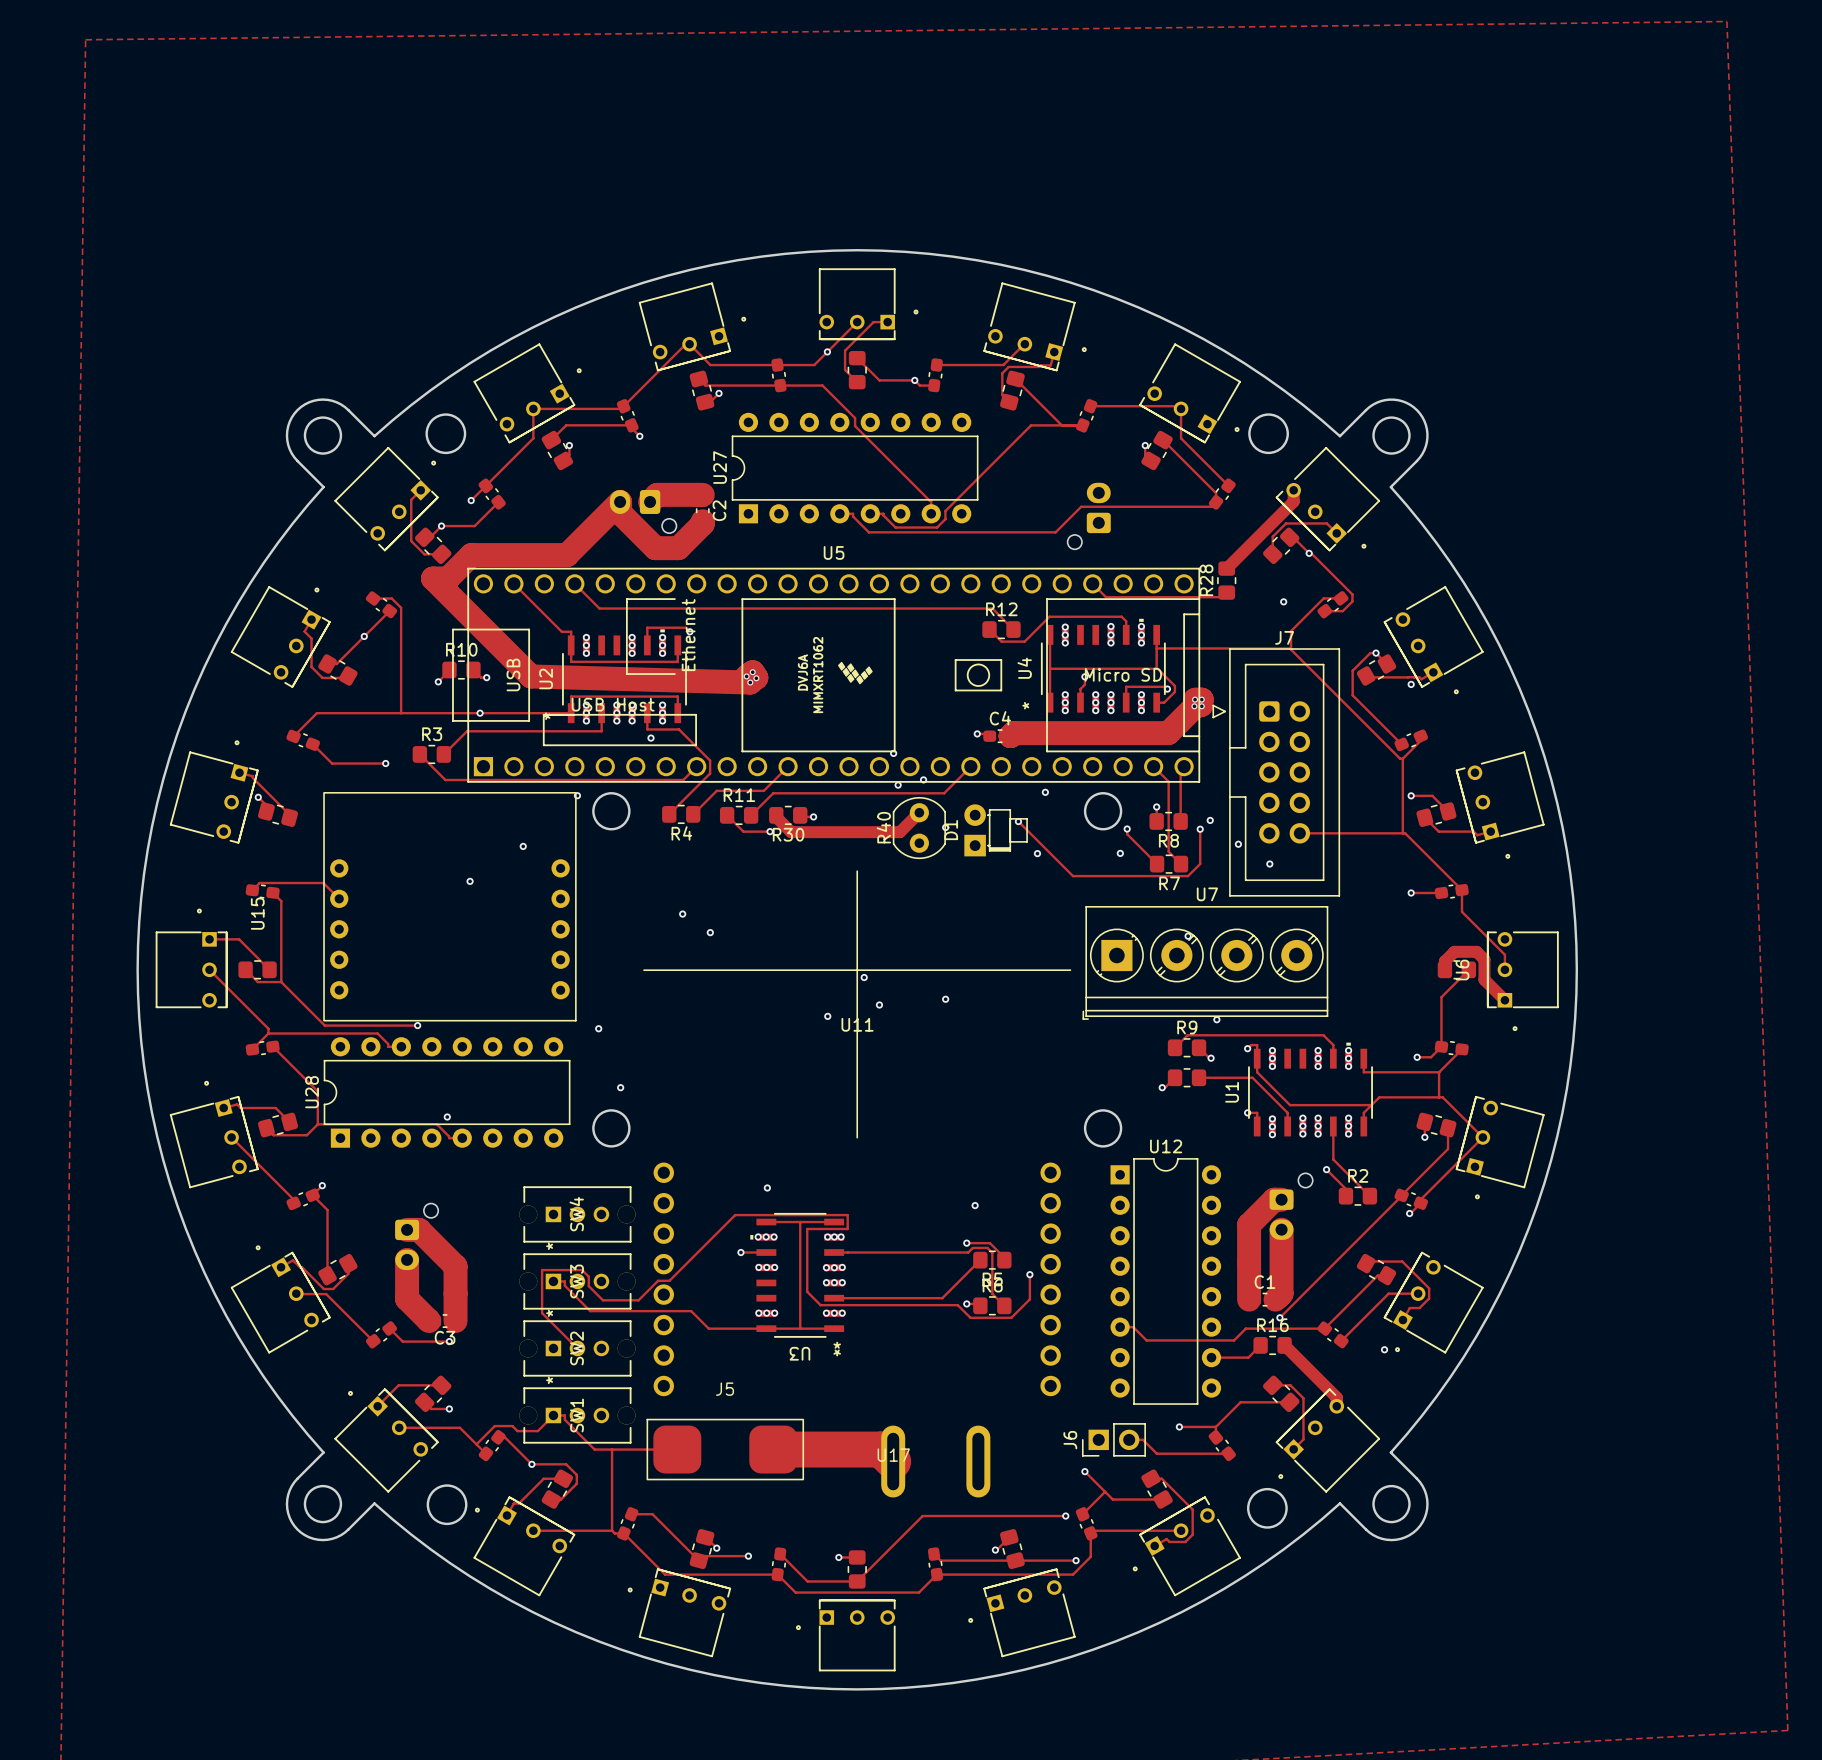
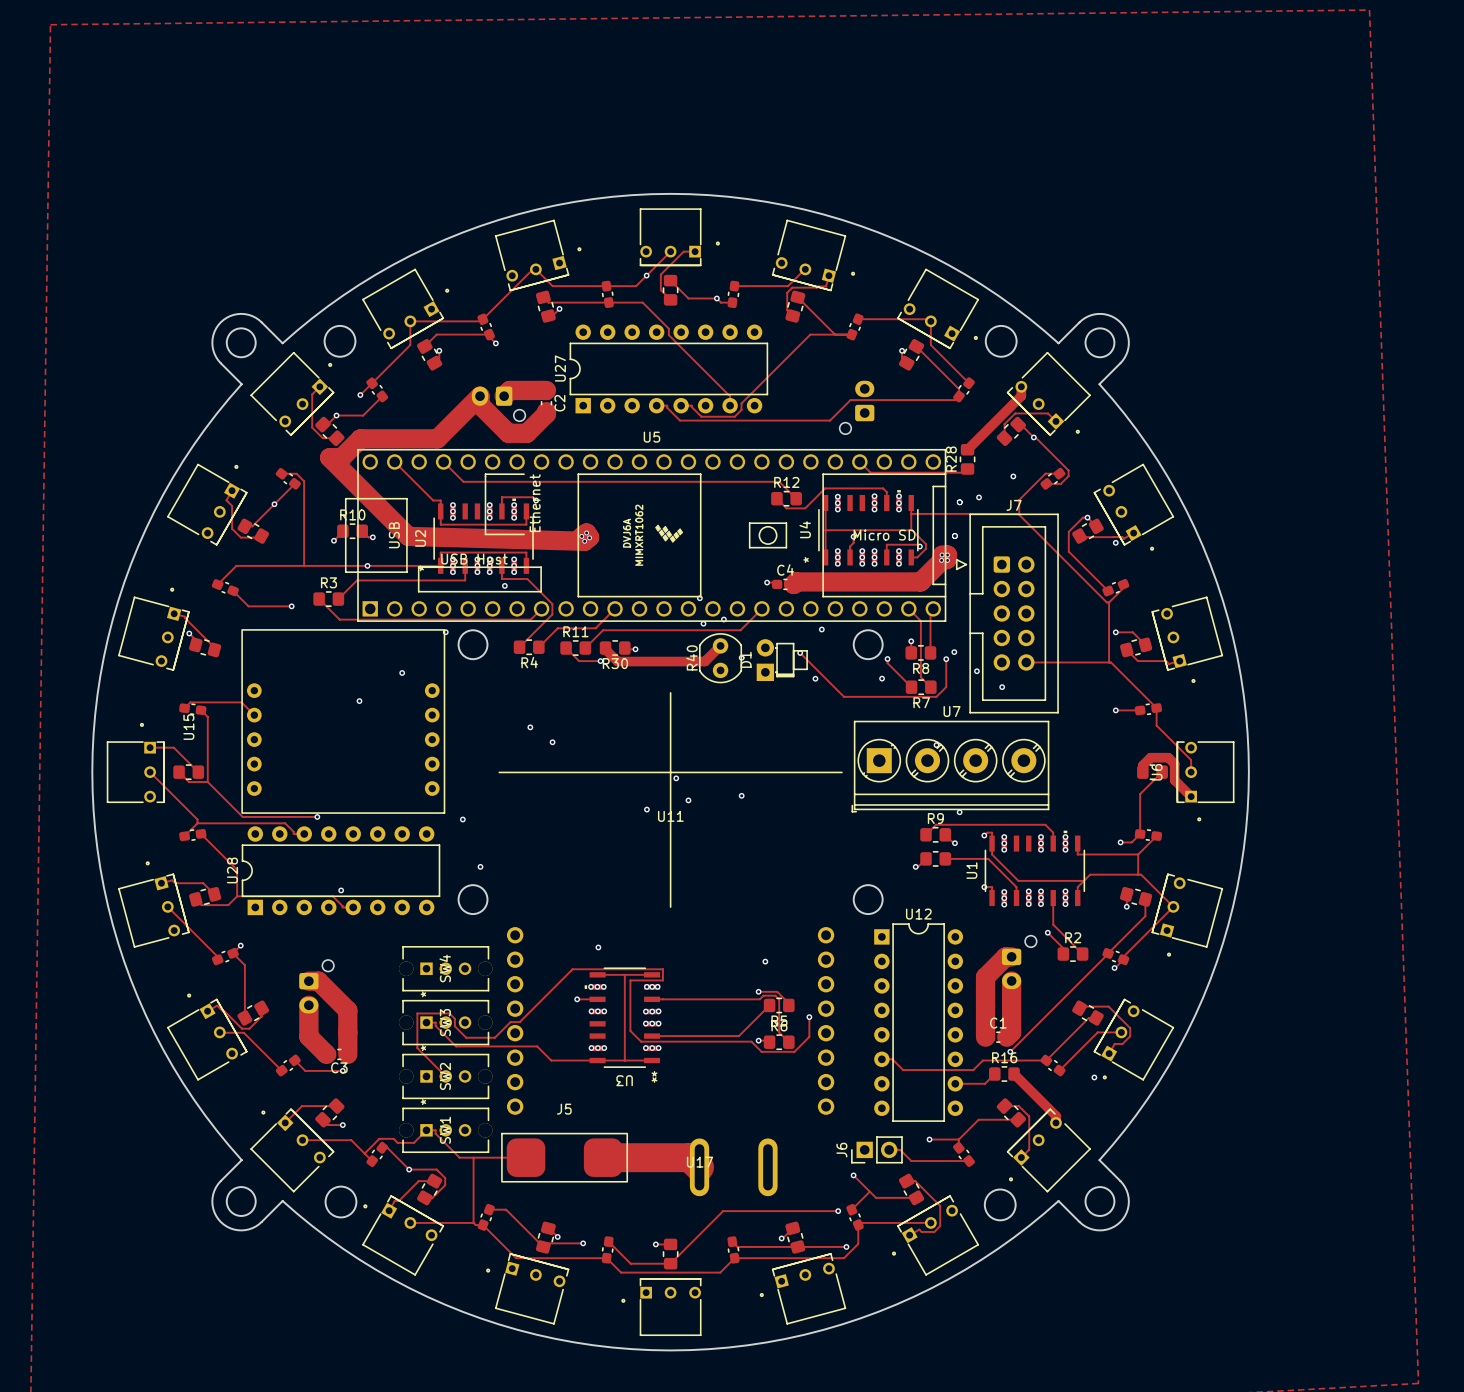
via: none -> (979, 497)
via: none -> (959, 502)
via: none -> (954, 536)

